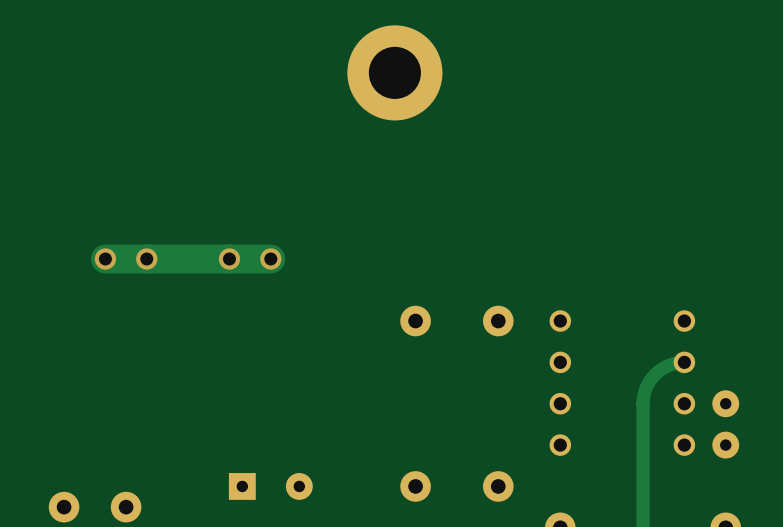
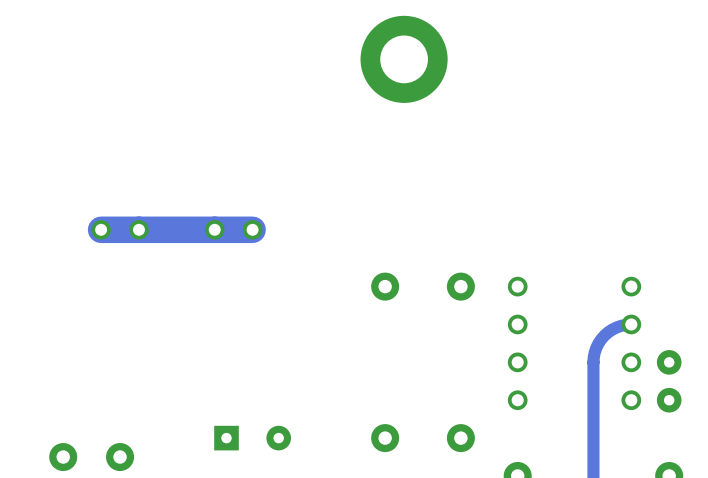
part position: (394, 72) -> (404, 59)

